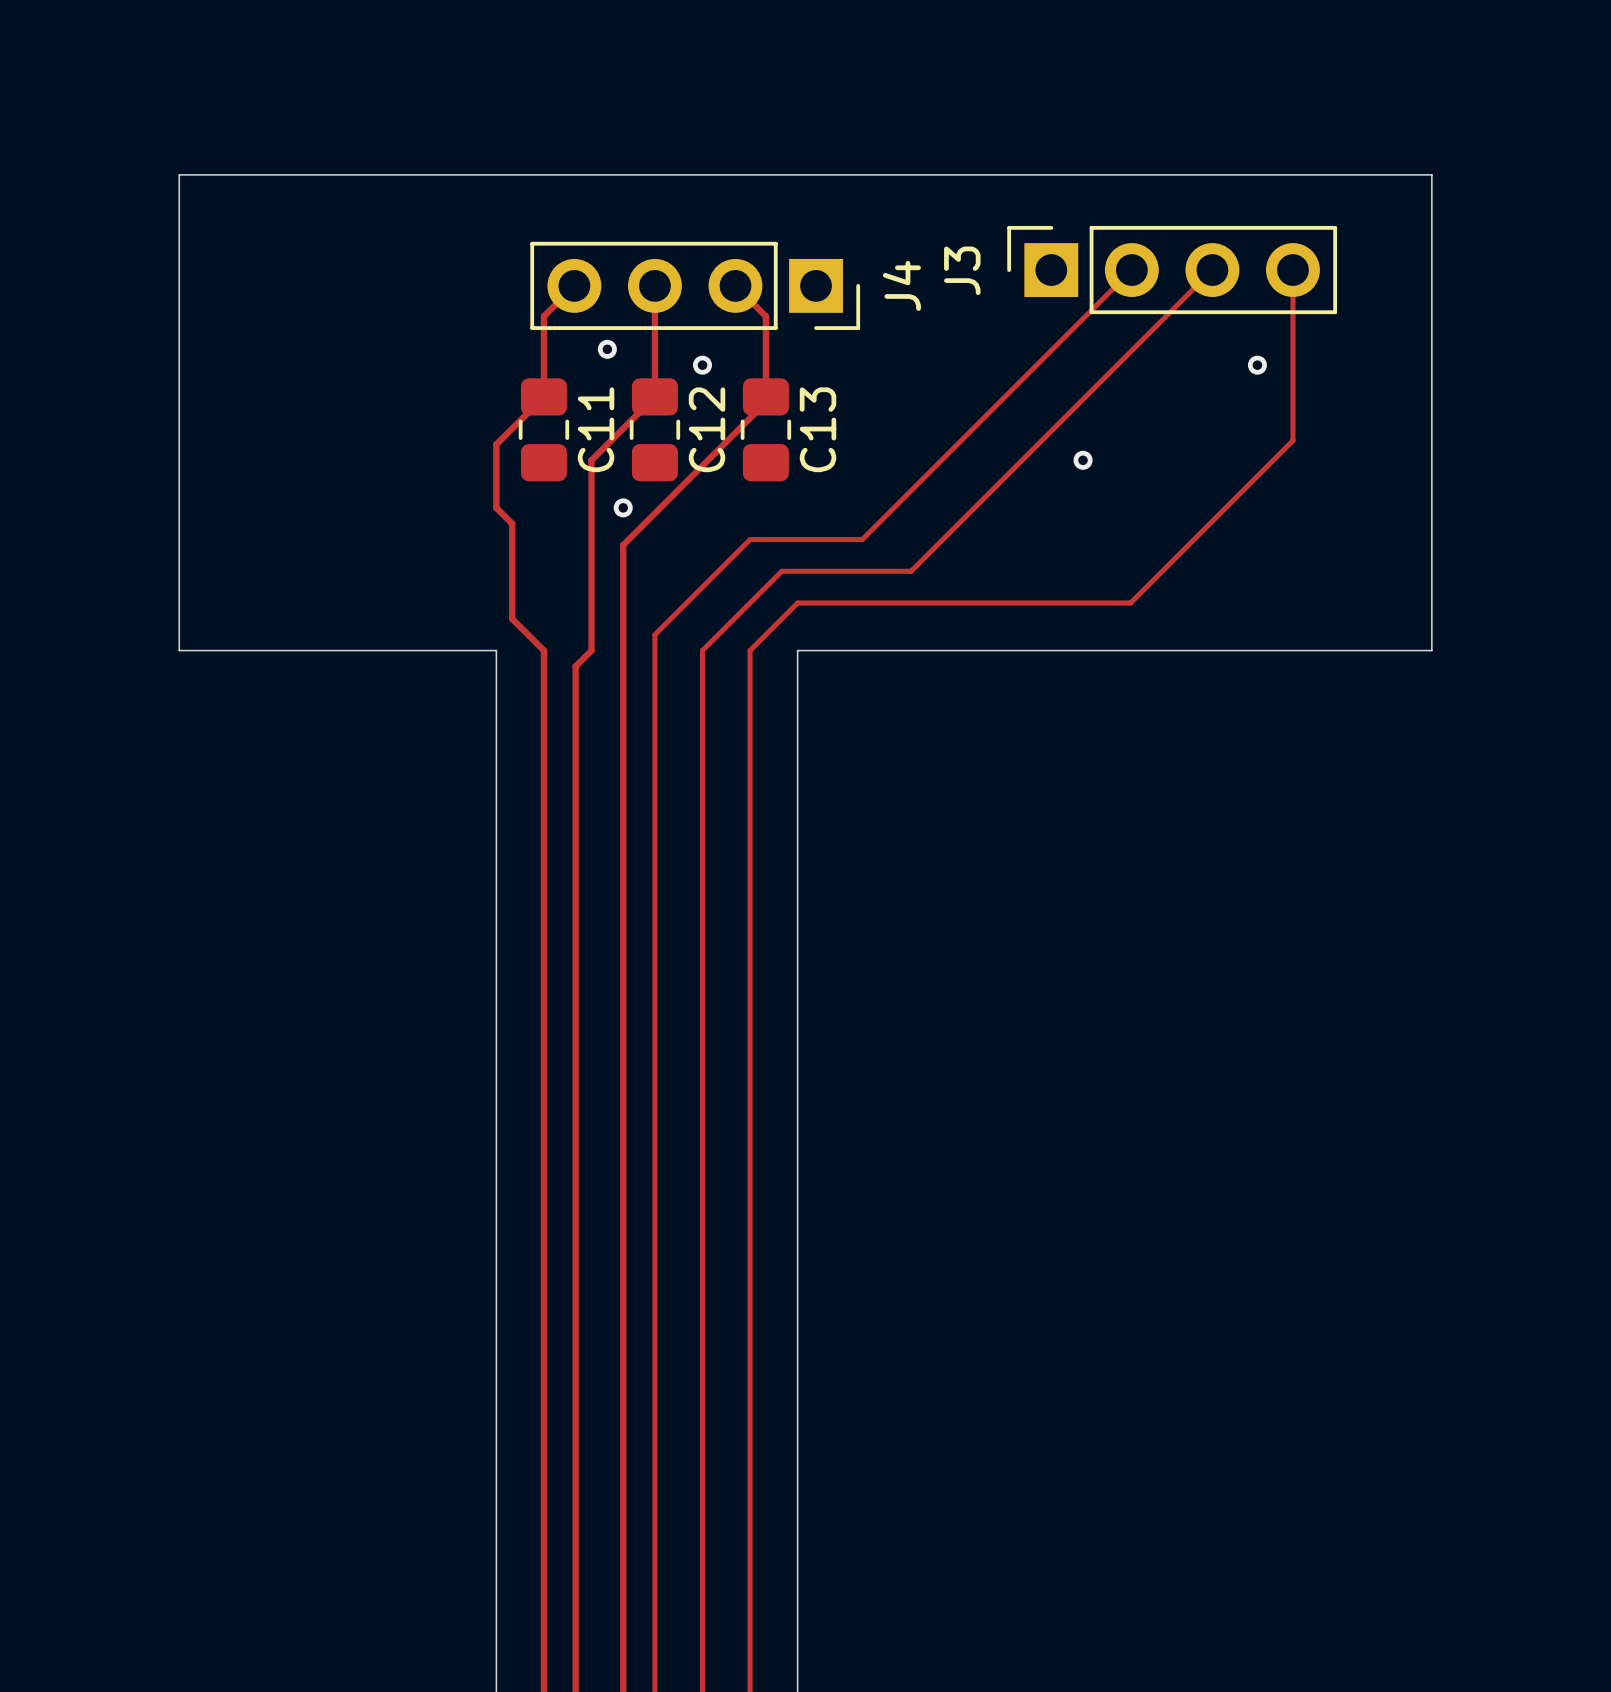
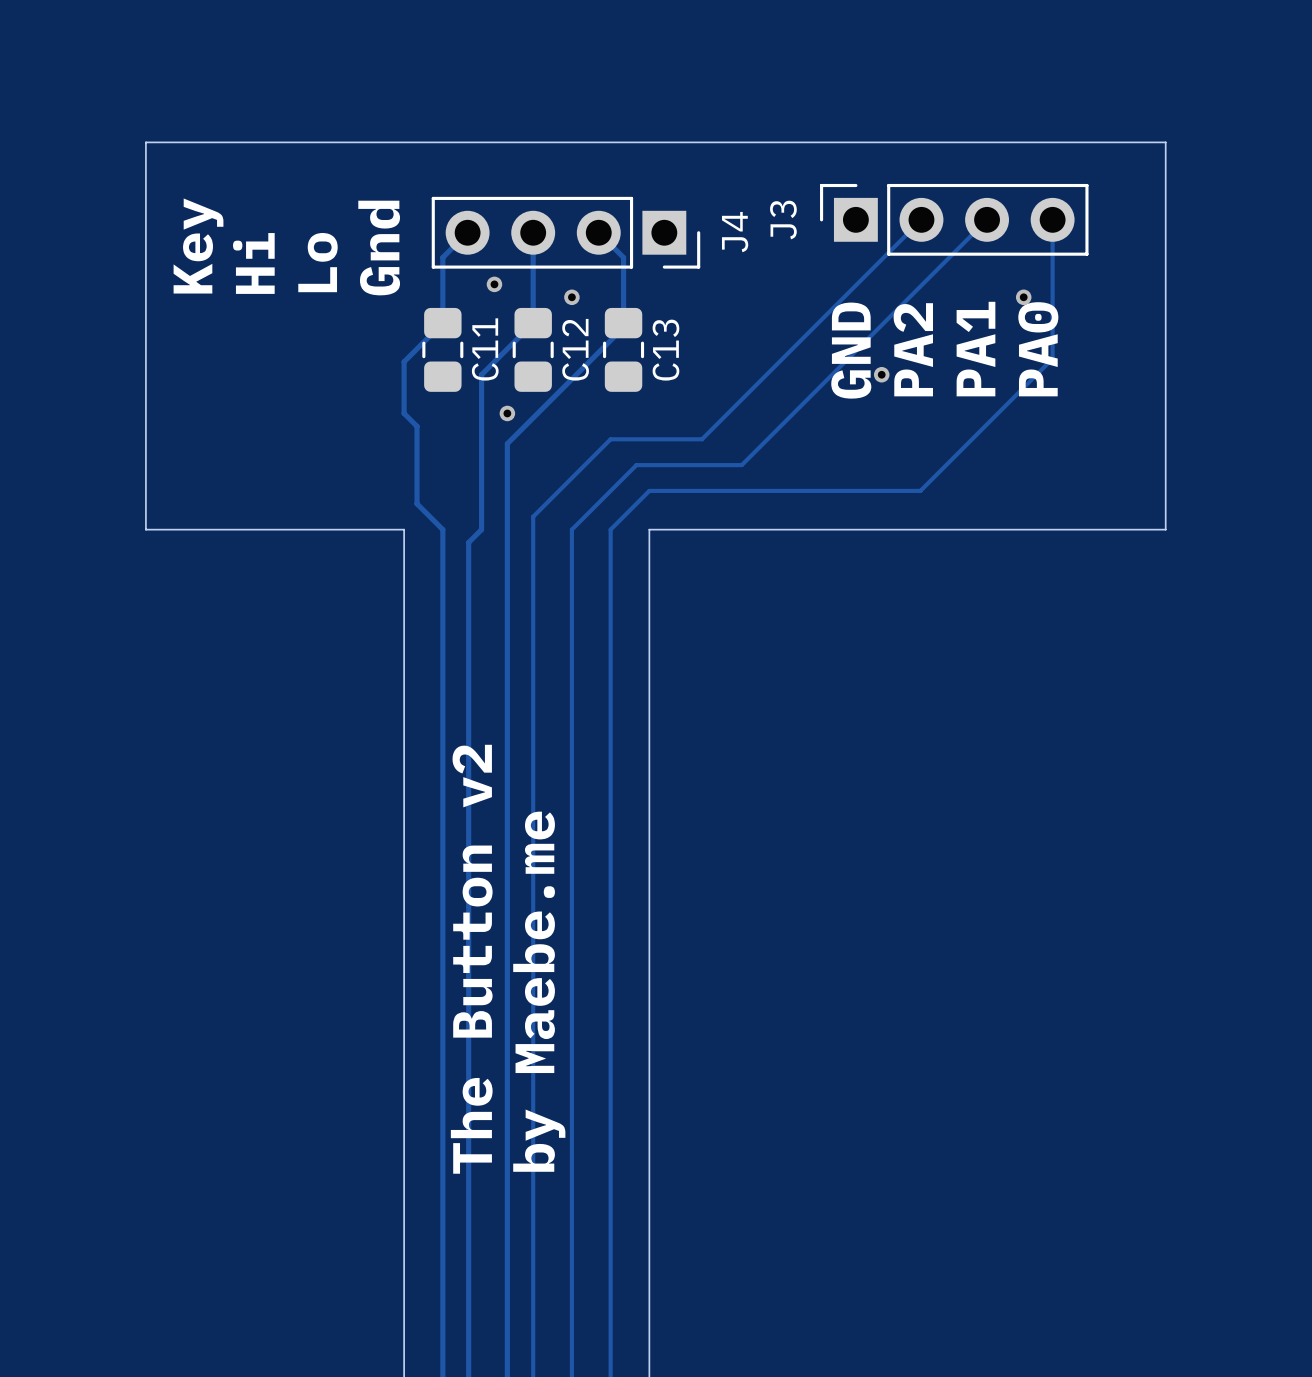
text: none -> Gnd (379, 248)
text: none -> Key (198, 246)
text: none -> Lo (317, 262)
text: none -> Hi (253, 263)
text: none -> GND (851, 350)
text: none -> PA2 (913, 349)
text: none -> PA1 (975, 349)
text: none -> PA0 (1038, 349)
text: none -> The Button v2 (471, 959)
text: none -> by Maebe.me (539, 991)

